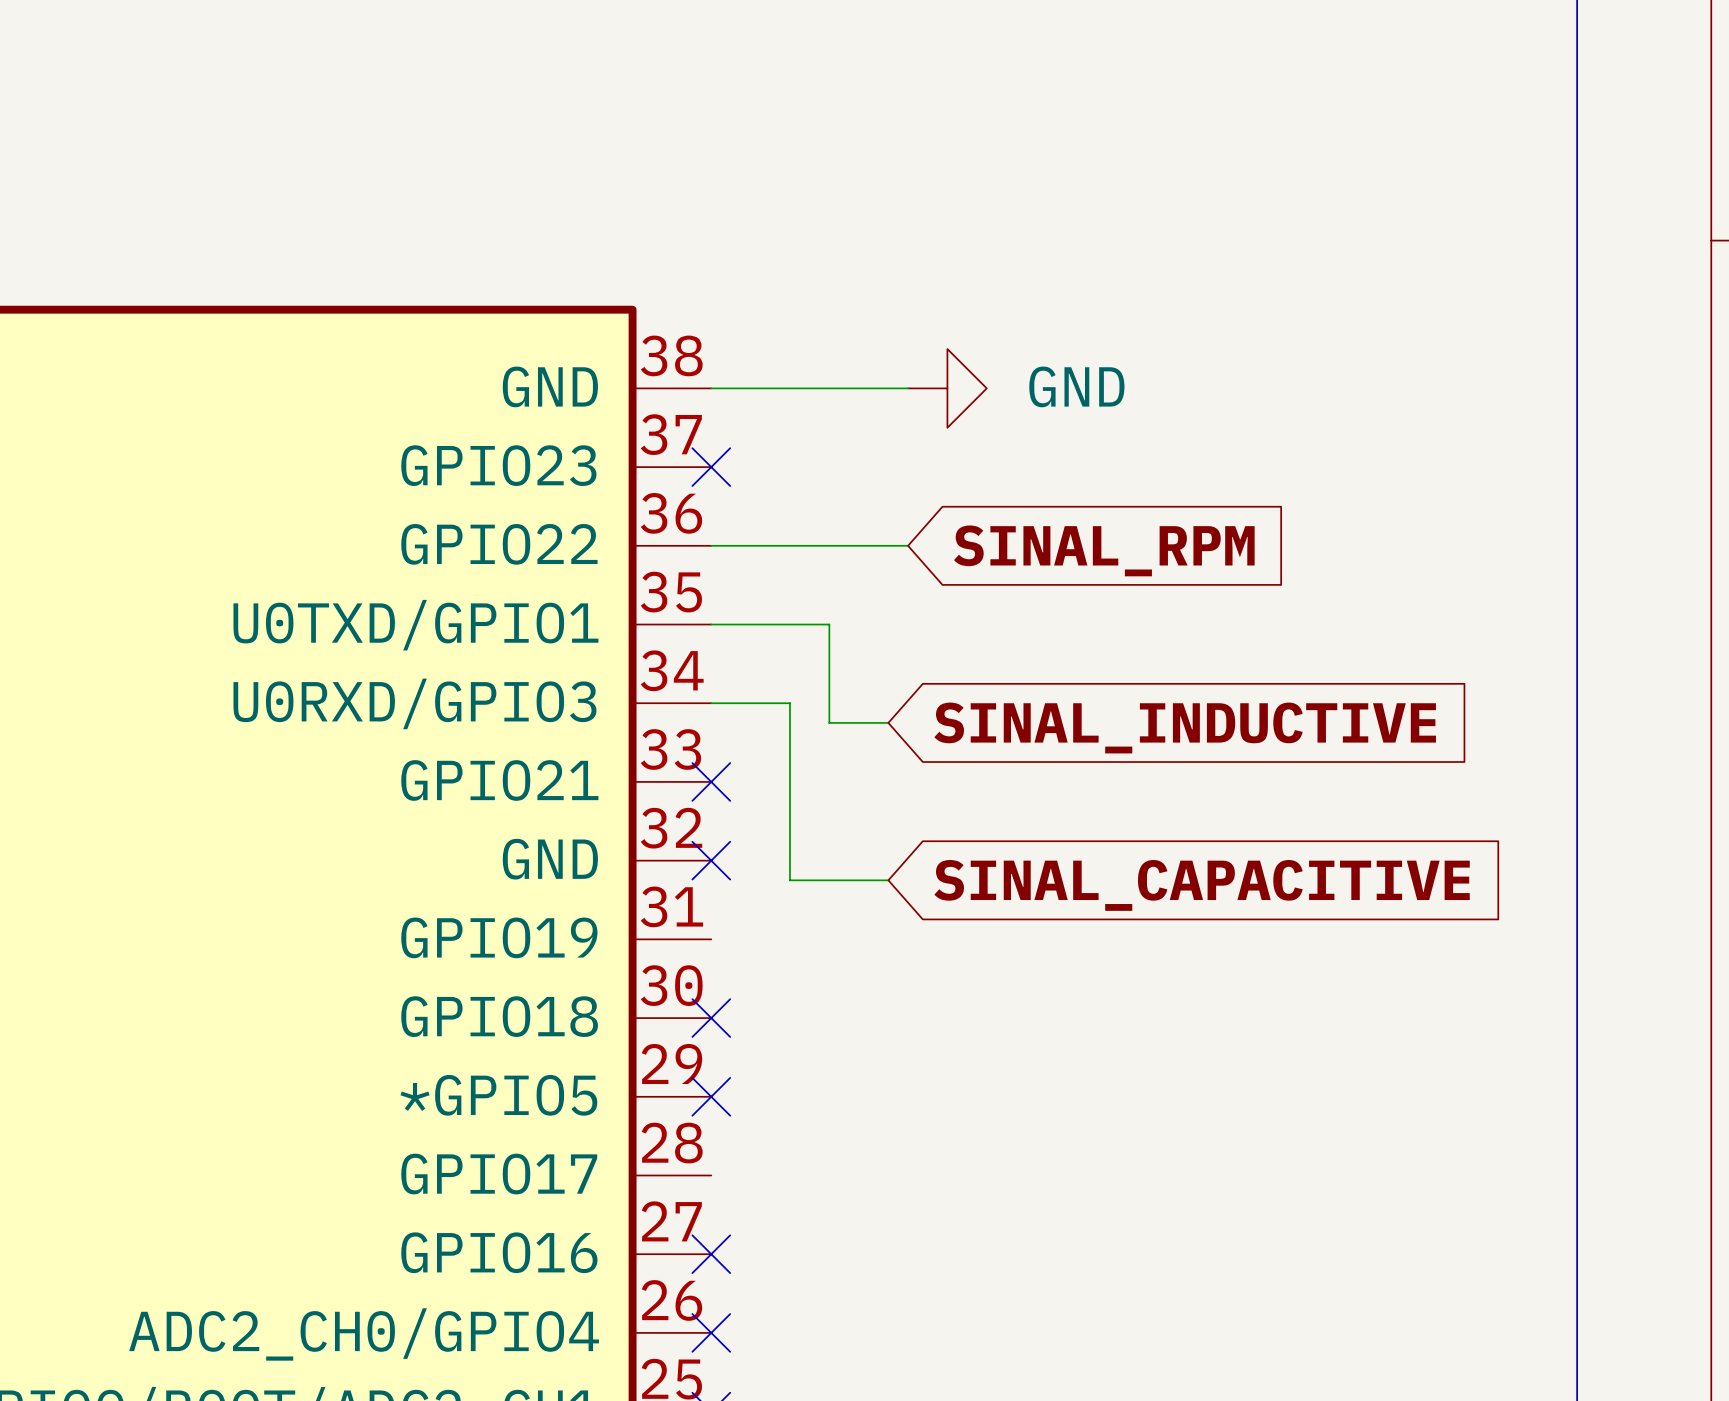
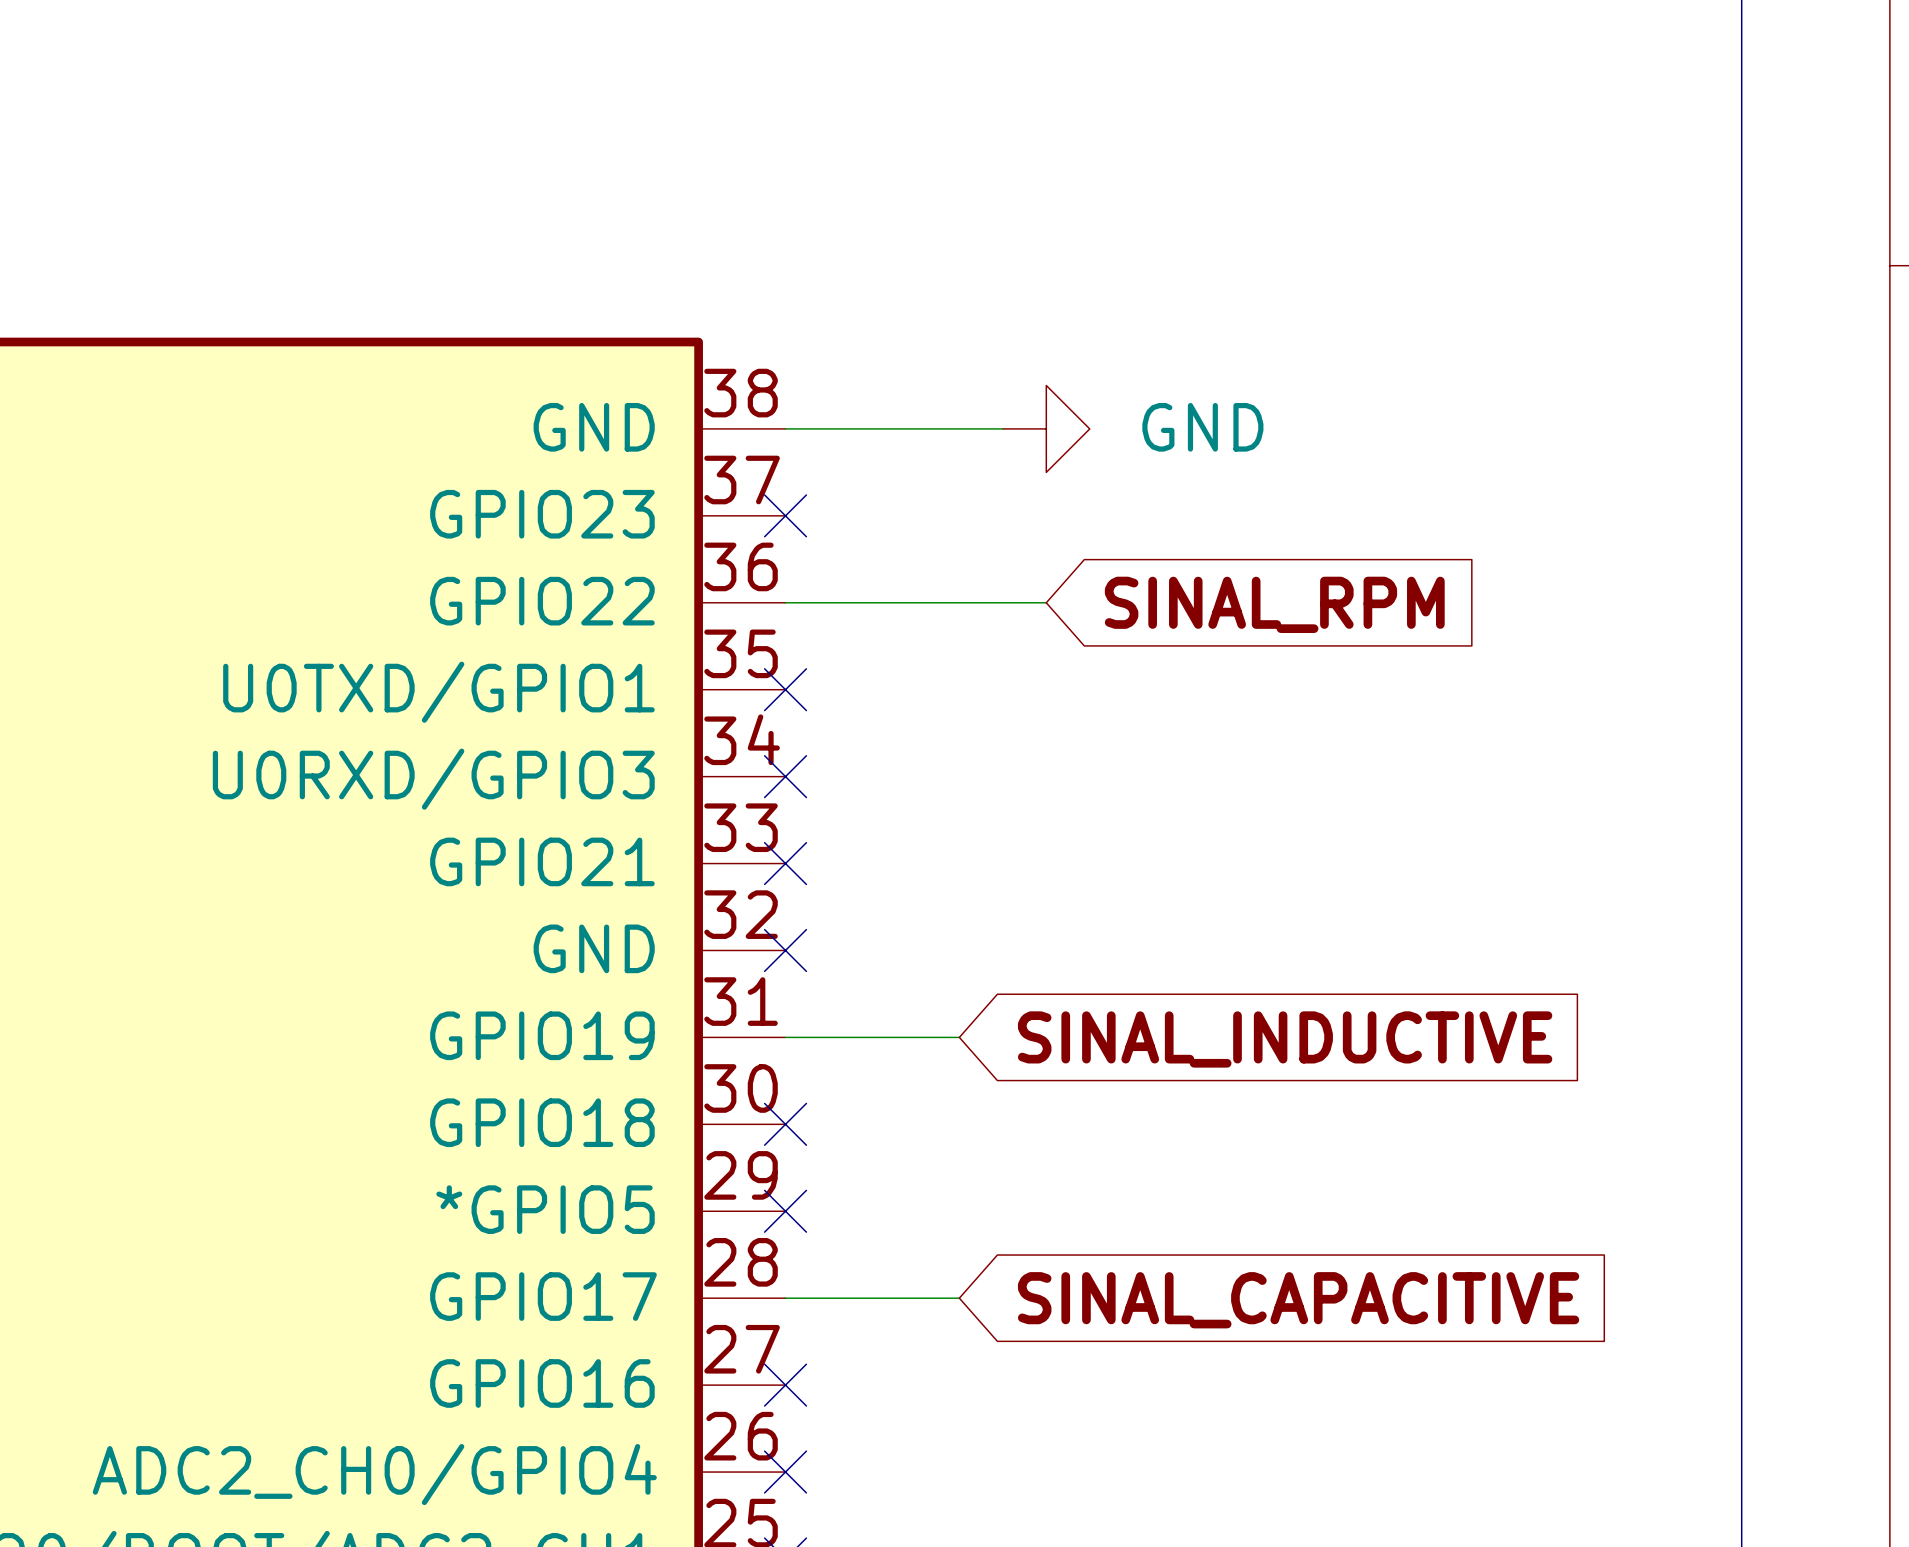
wire: none -> (1002, 602) (1046, 602)
global label position: SINAL_RPM (1104, 550) -> SINAL_RPM (1274, 604)
wire: (711, 624) (829, 624) (829, 722) (888, 722) -> none
no-connect mark: none -> (785, 689)
wire: (711, 703) (790, 703) (790, 880) (888, 880) -> none
no-connect mark: none -> (785, 776)
global label position: SINAL_INDUCTIVE (1185, 727) -> SINAL_INDUCTIVE (1285, 1039)
global label position: SINAL_CAPACITIVE (1202, 885) -> SINAL_CAPACITIVE (1298, 1300)
wire: none -> (785, 1037) (959, 1037)
wire: none -> (785, 1298) (959, 1298)

